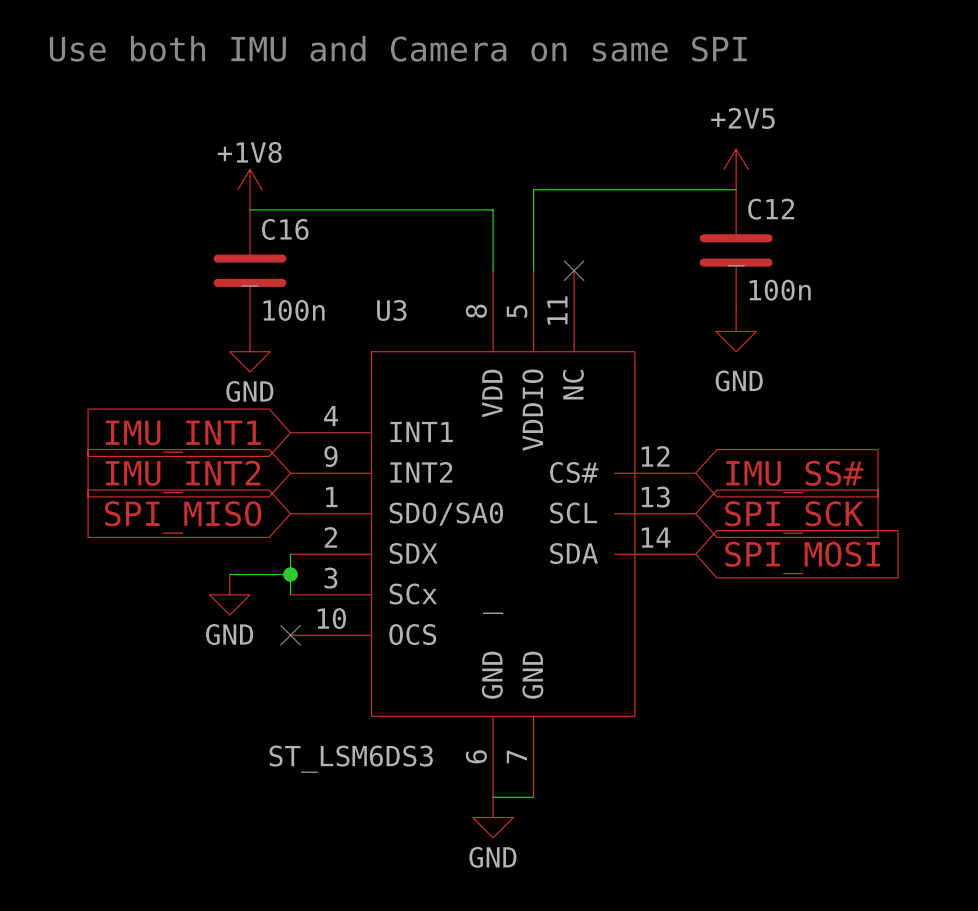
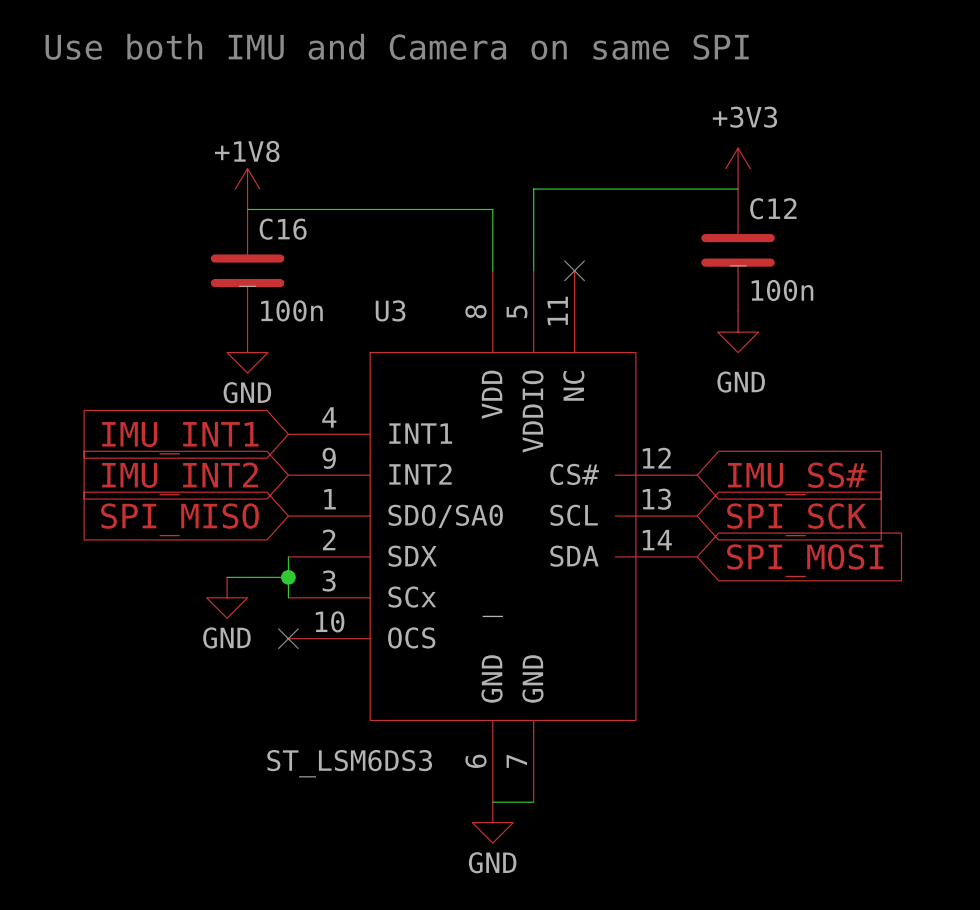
power symbol: +2V5 (736, 169) -> +3V3 (738, 168)

